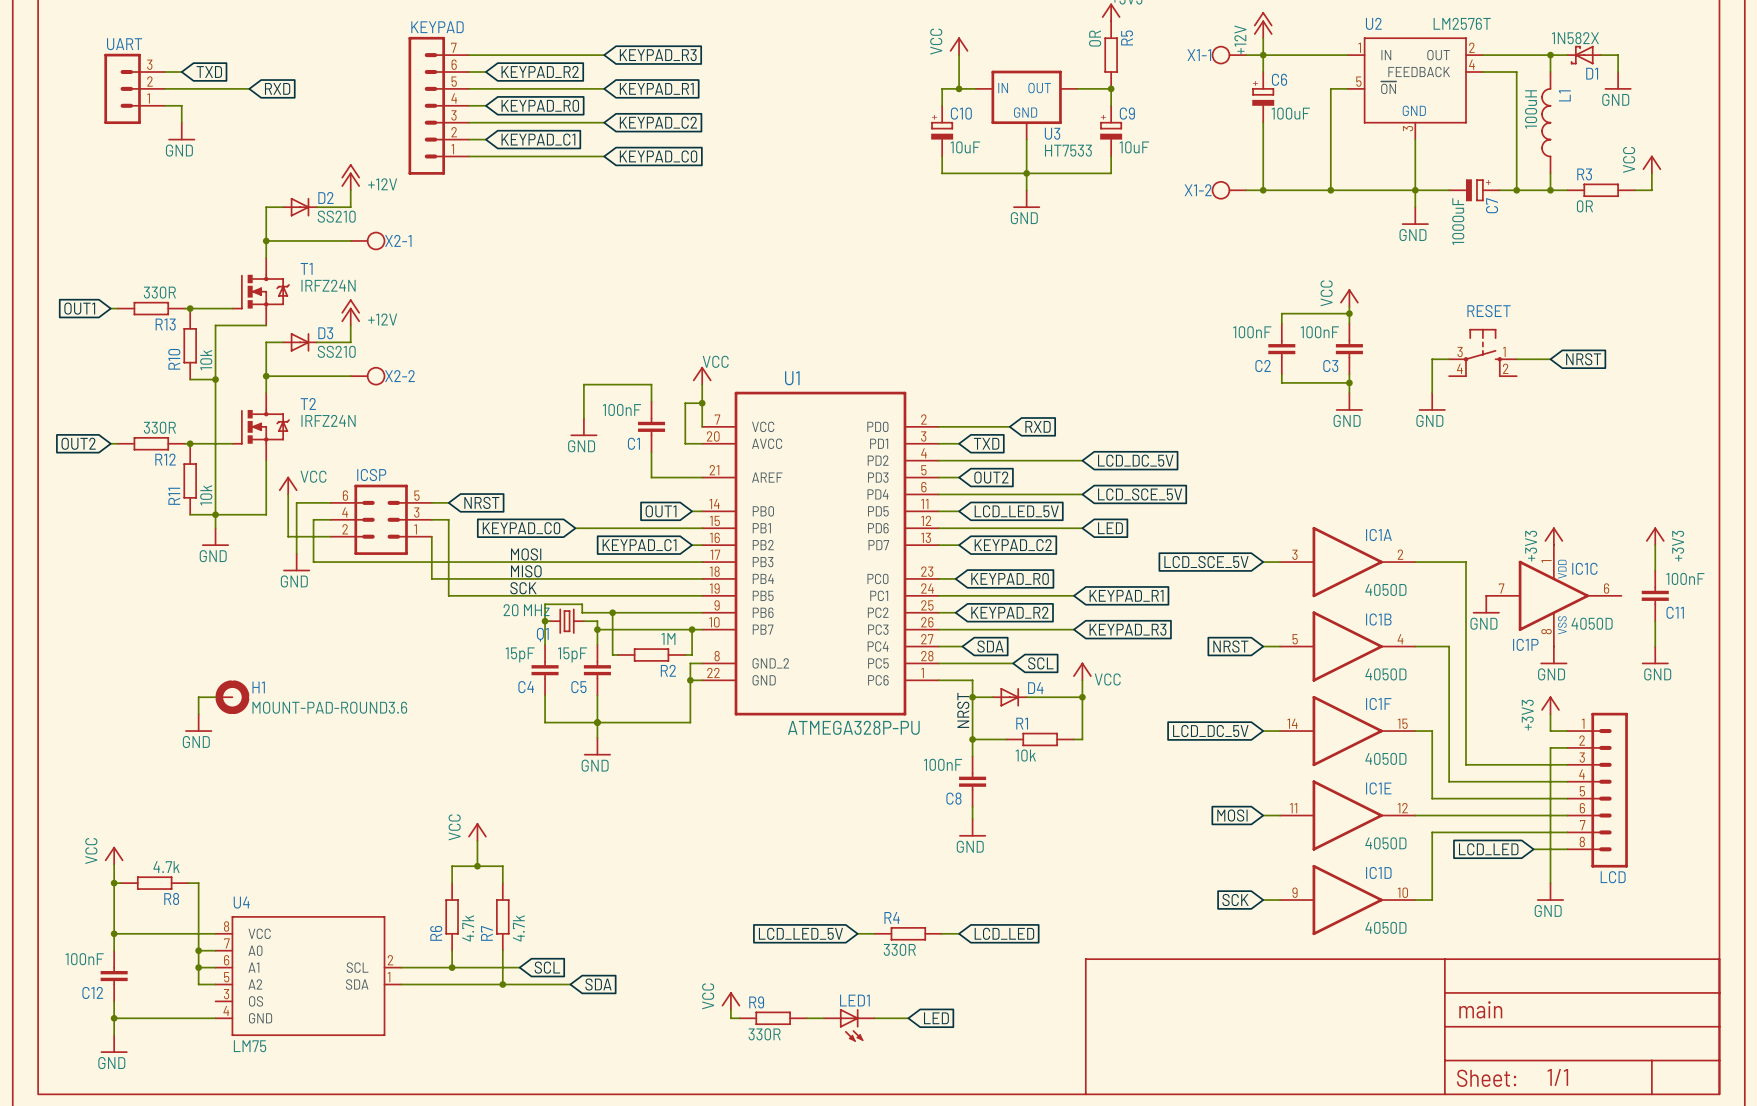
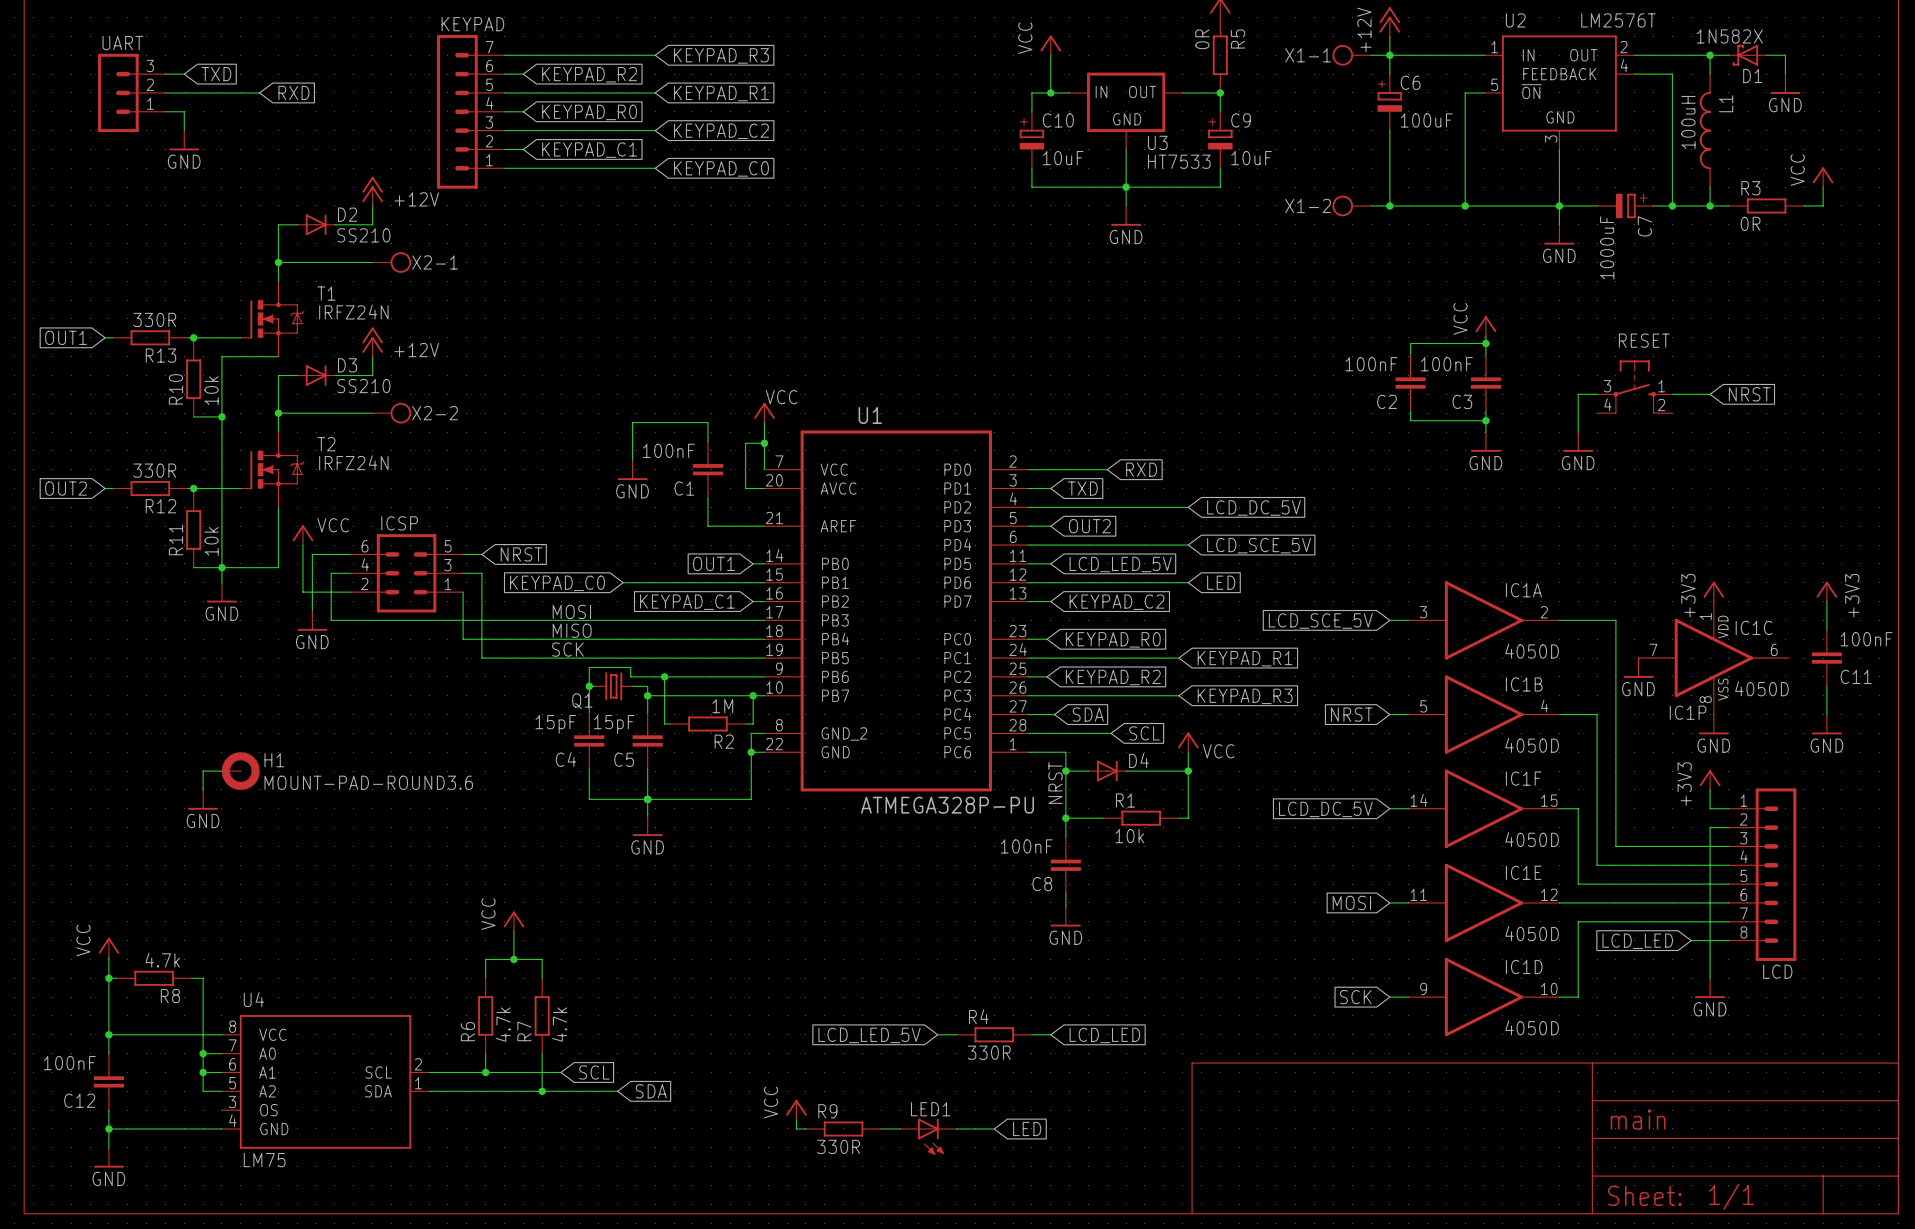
Q1 value: 20 MHz (526, 610) -> none

